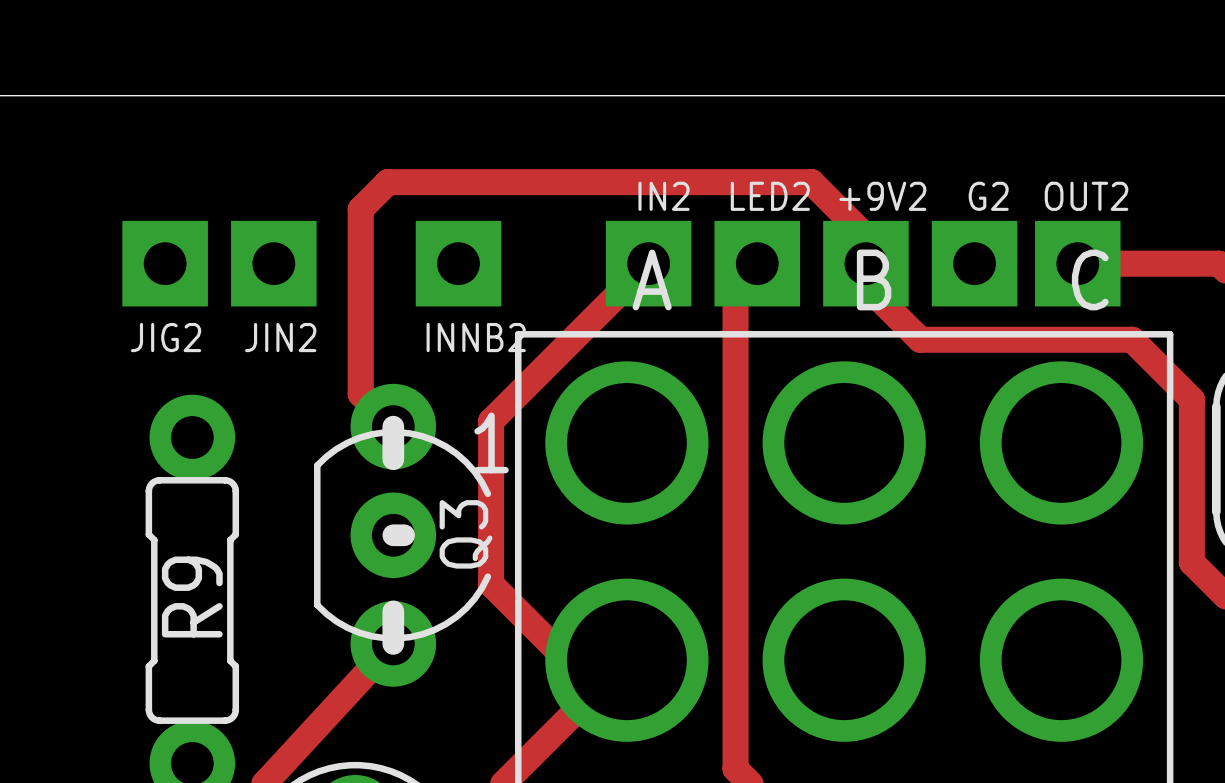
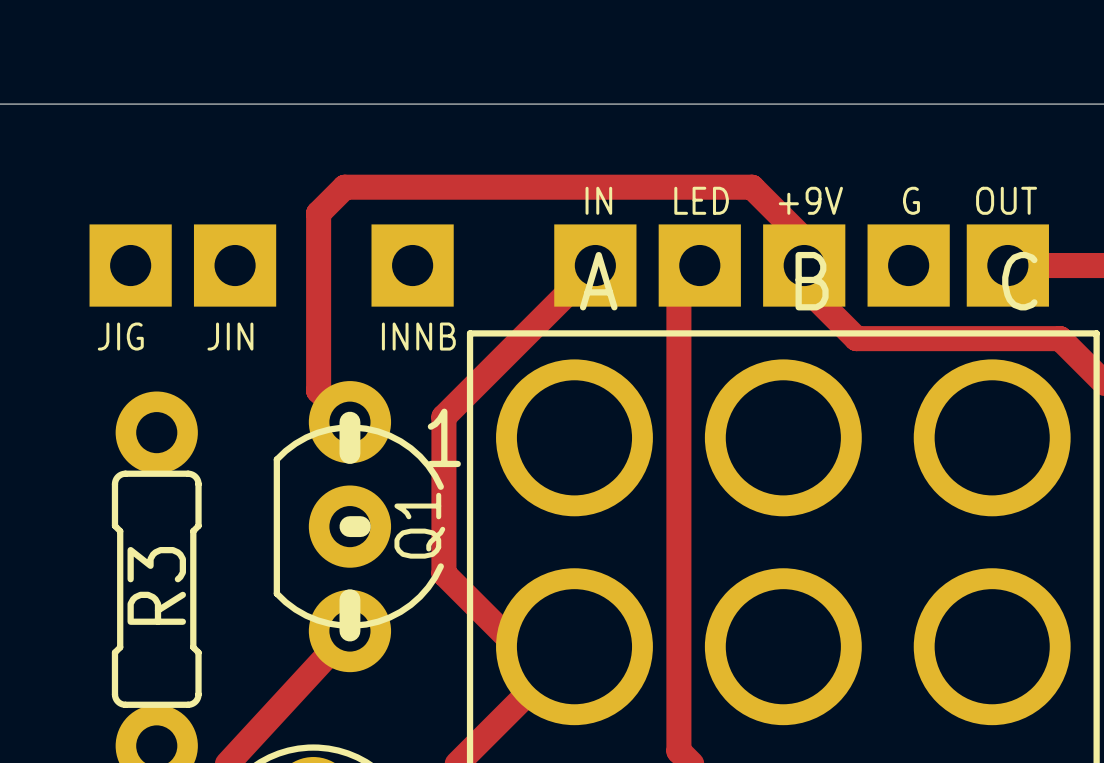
IN2 name: IN2 (664, 196) -> none
LED2 name: LED2 (770, 196) -> none
+9V2 name: +9V2 (882, 196) -> none
G2 name: G2 (988, 196) -> none
OUT2 name: OUT2 (1086, 196) -> none
JIG2 name: JIG2 (166, 337) -> none
JIN2 name: JIN2 (280, 337) -> none
INNB2 name: INNB2 (476, 337) -> none
Q3 name: Q3 (466, 534) -> none
text: none -> Q1 (419, 525)
R9 name: R9 (192, 597) -> none
text: none -> R3 (156, 585)

